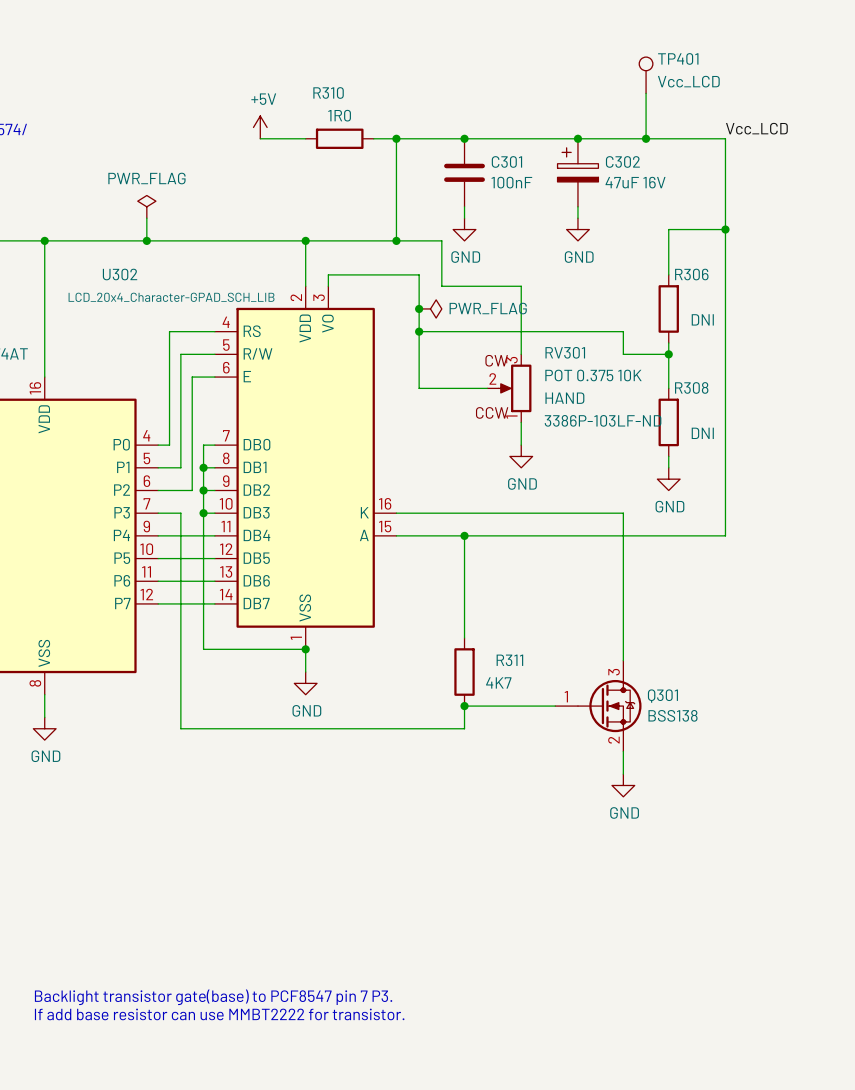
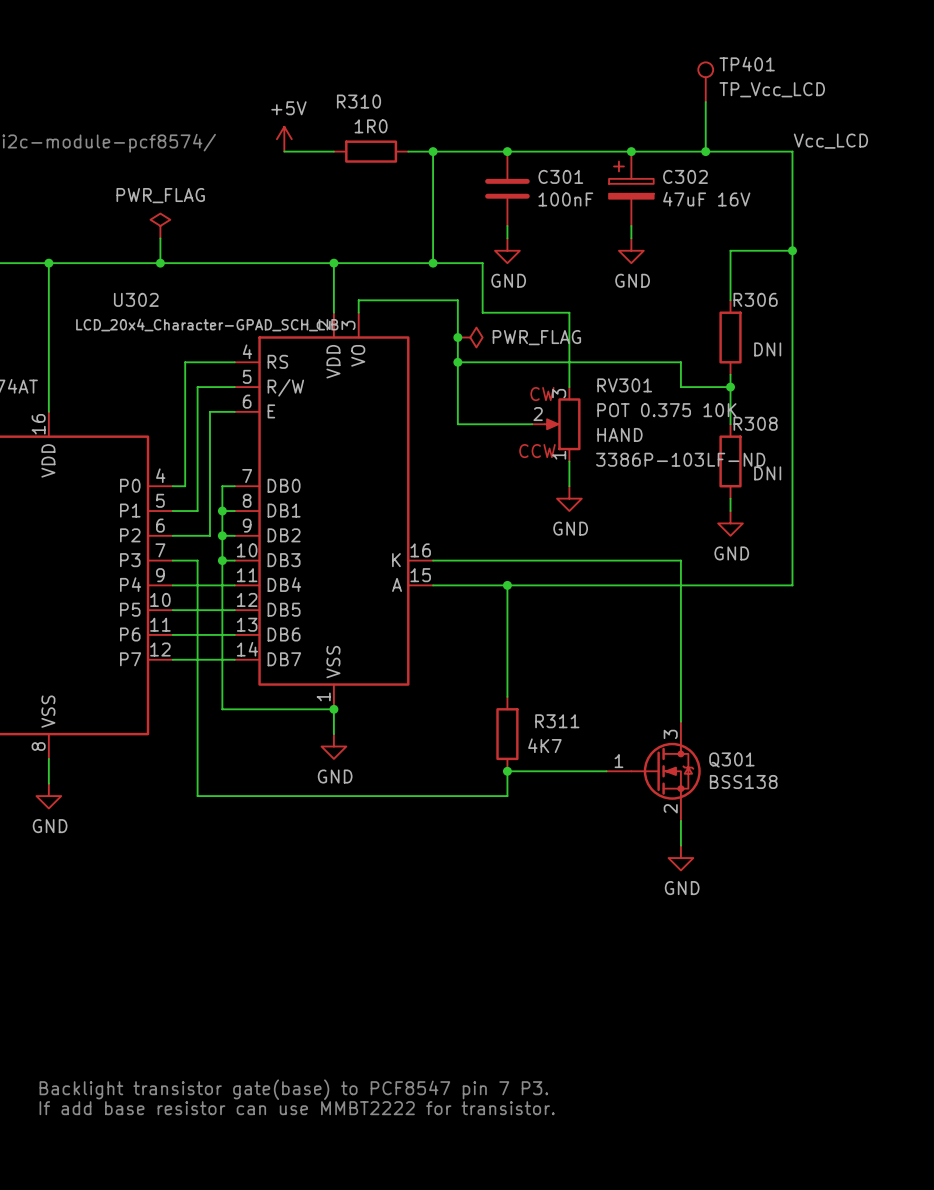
TP401 value: Vcc_LCD (688, 81) -> TP_Vcc_LCD (772, 89)

